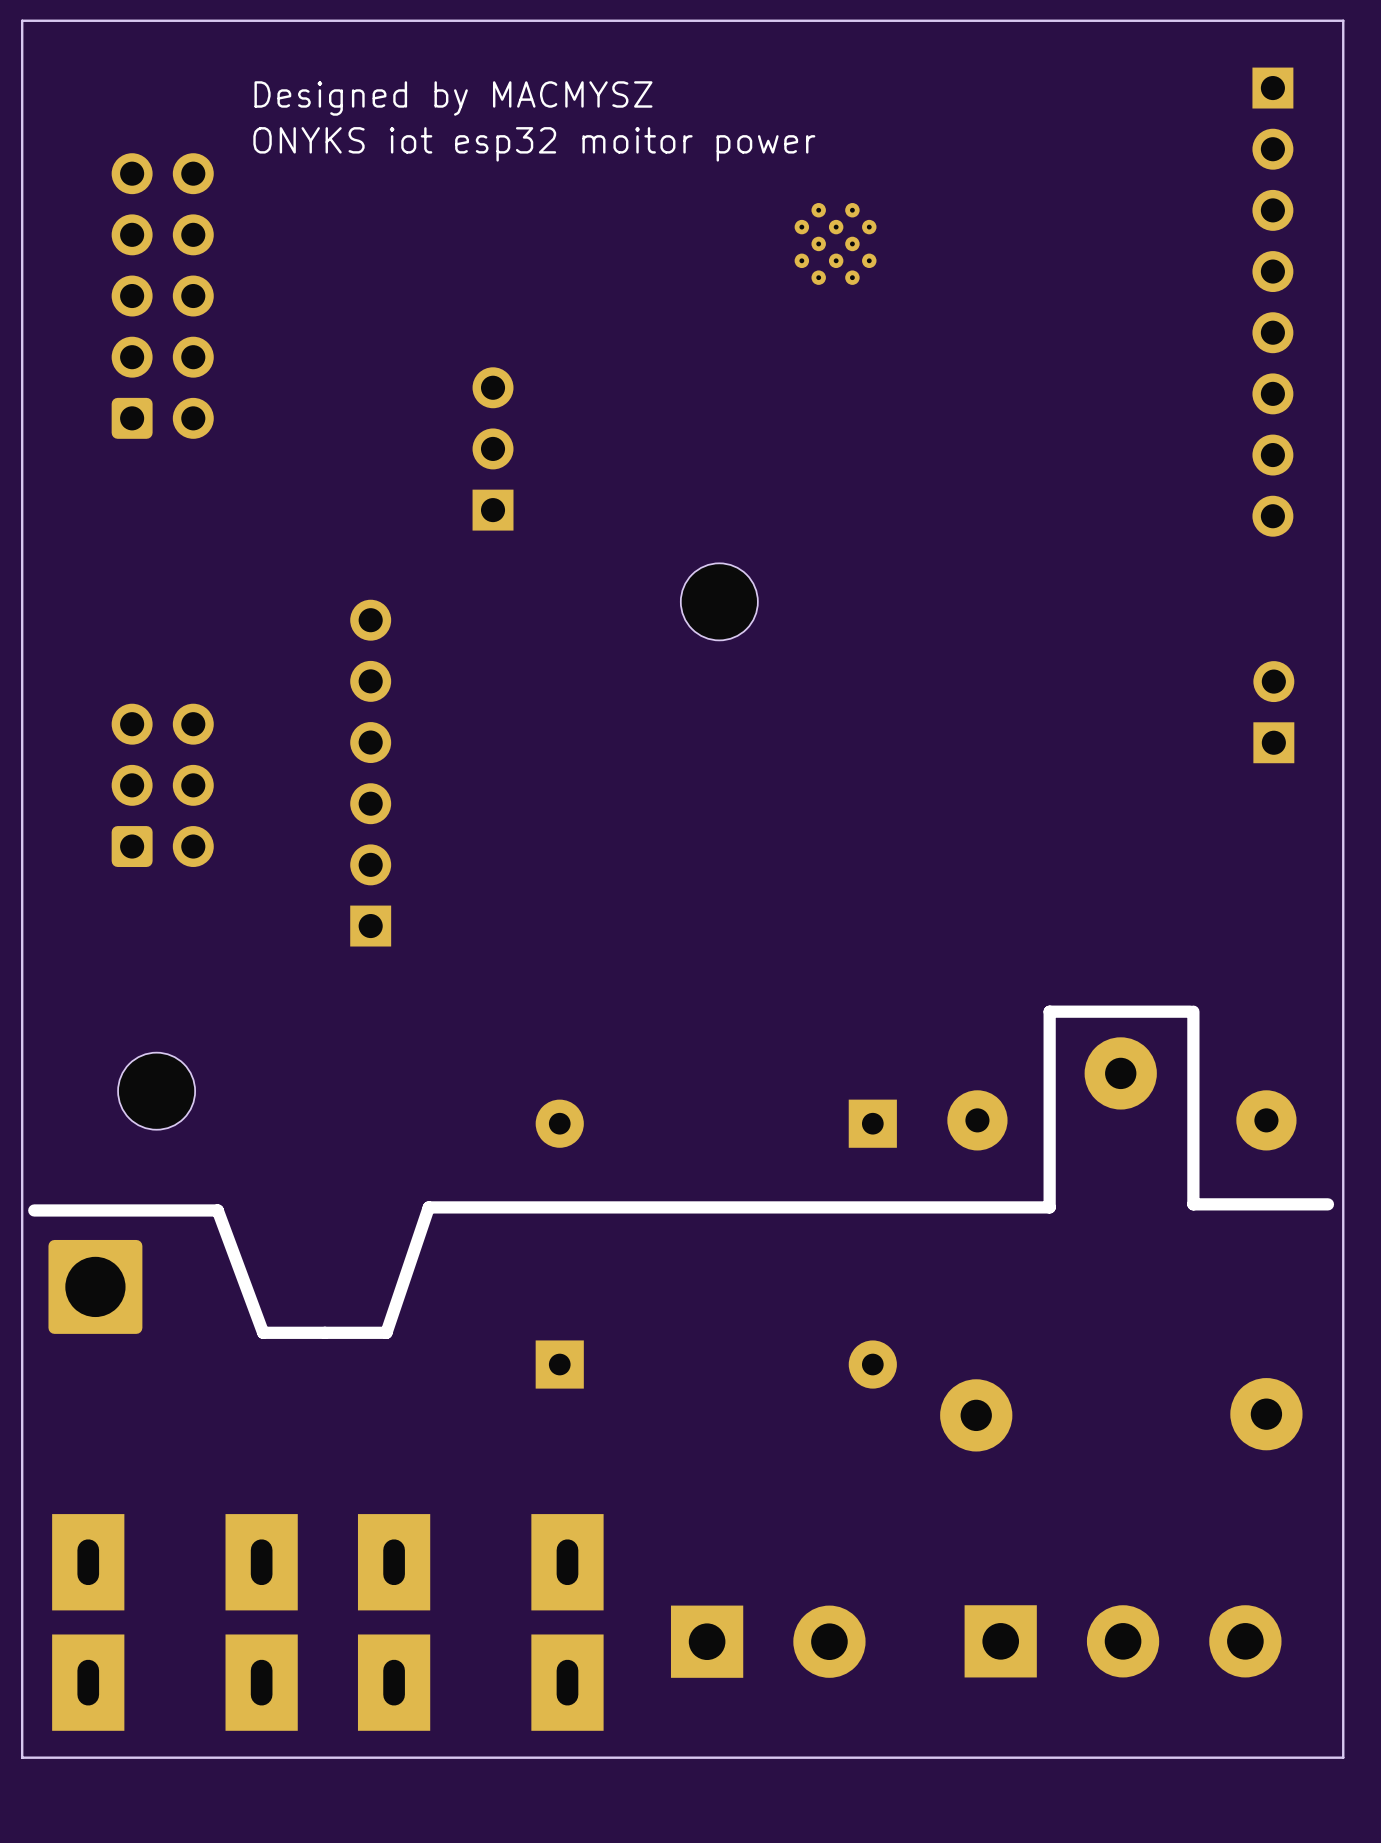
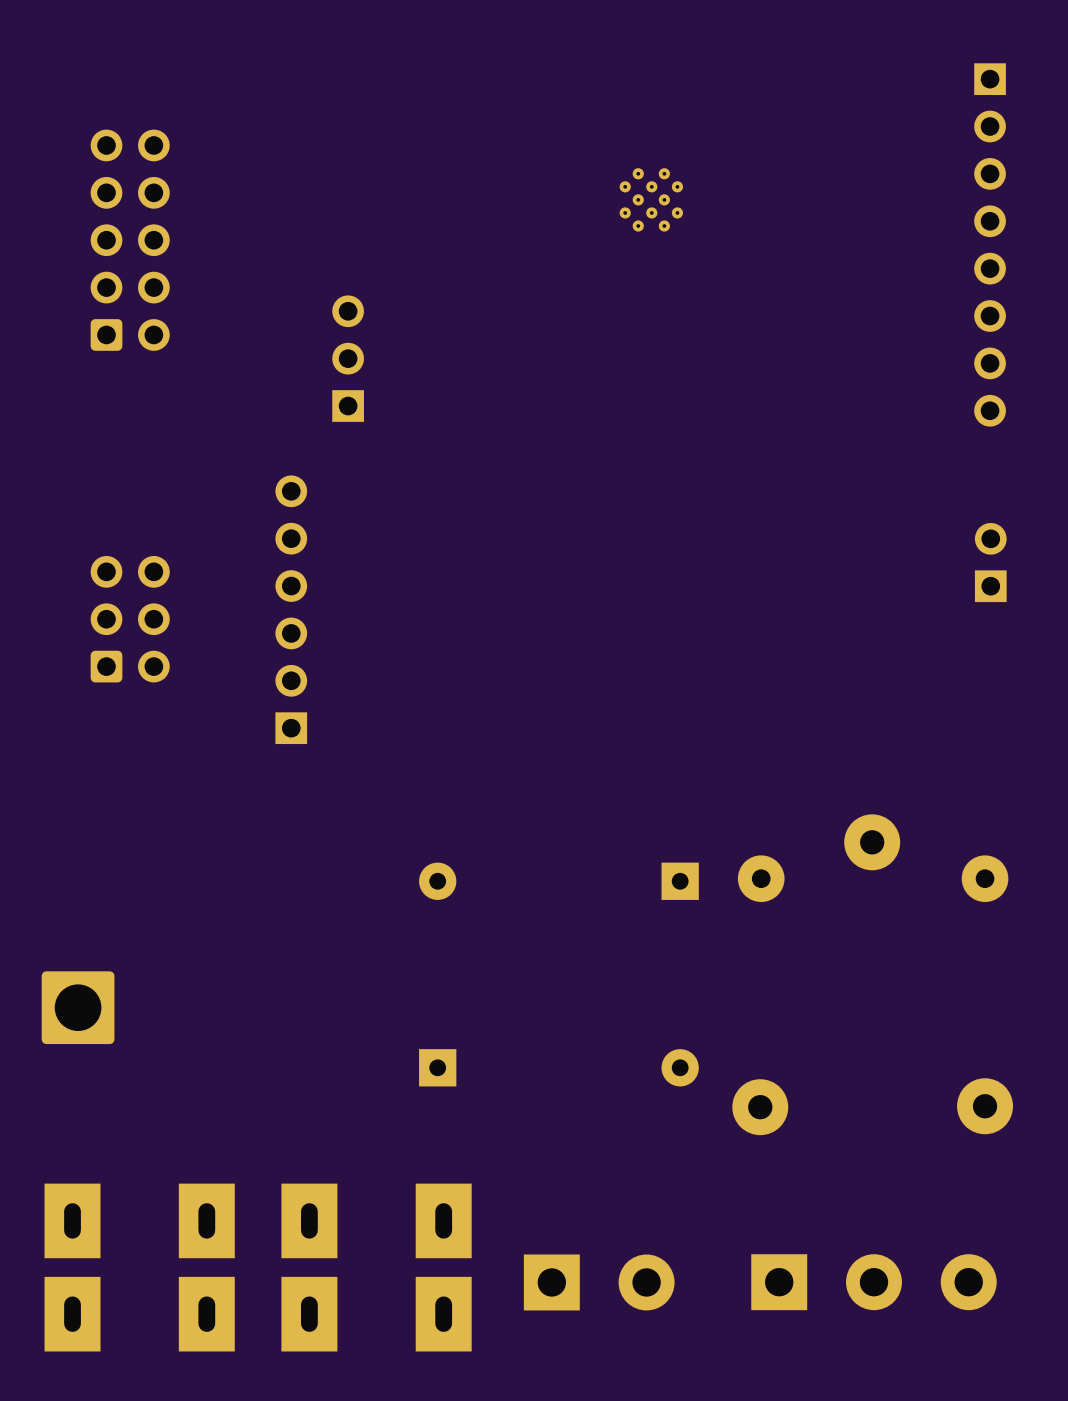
board edge: (1343, 20) (22, 20) (22, 1757) (1343, 1757) (1343, 20) -> none
text: Designed by MACMYSZ (453, 98) -> none
text: ONYKS iot esp32 moitor power (534, 144) -> none
part position: (493, 448) -> (348, 358)
part: (719, 601) -> none
line: (1190, 1011) (1049, 1011) (1049, 1207) (428, 1207) (386, 1332) (263, 1332) -> none
line: (1193, 1011) (1193, 1204) (1327, 1204) -> none
part: (156, 1091) -> none
line: (34, 1210) (217, 1210) (263, 1332) -> none

